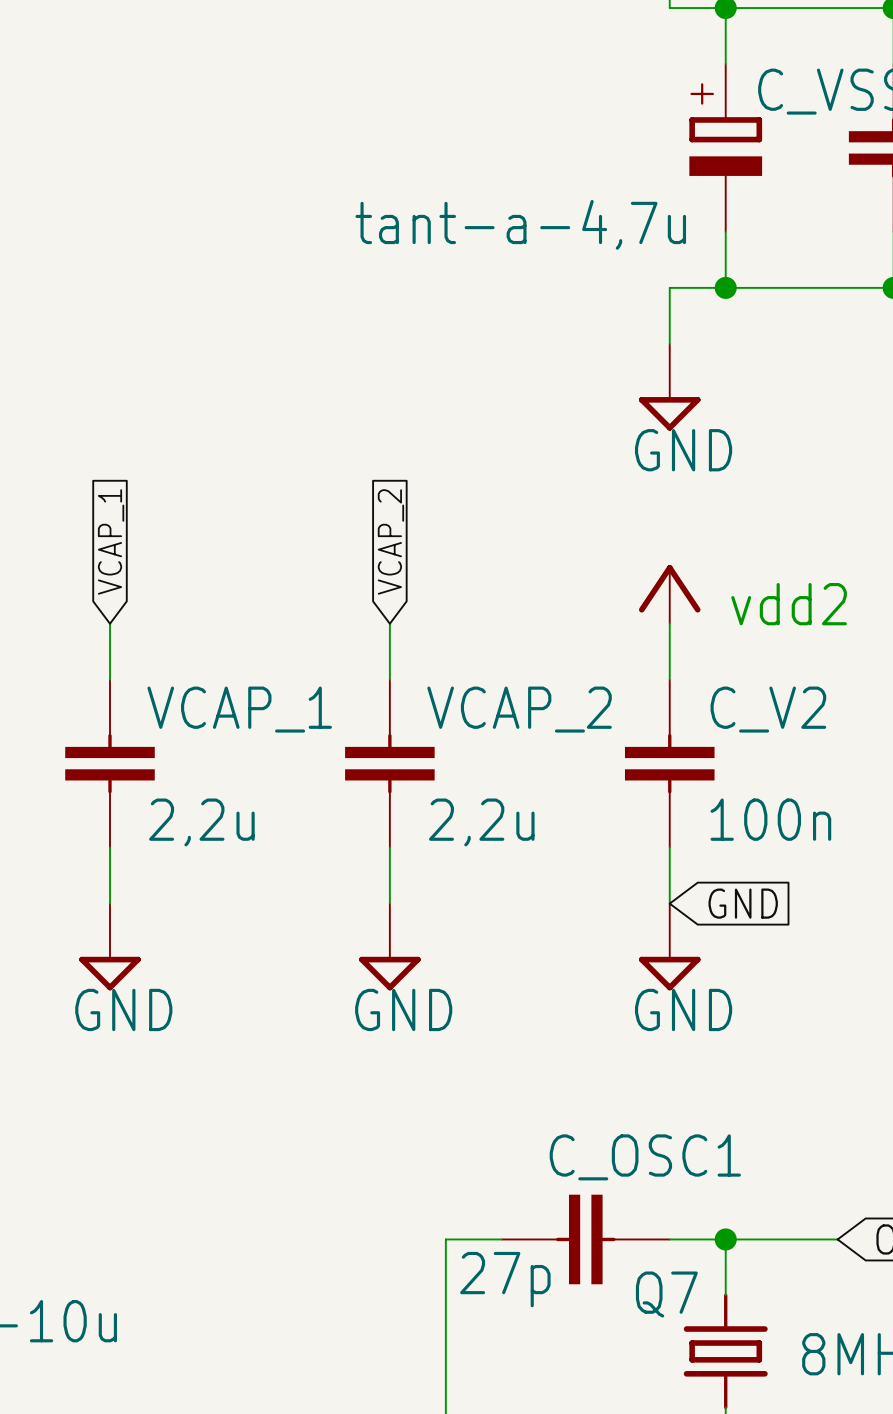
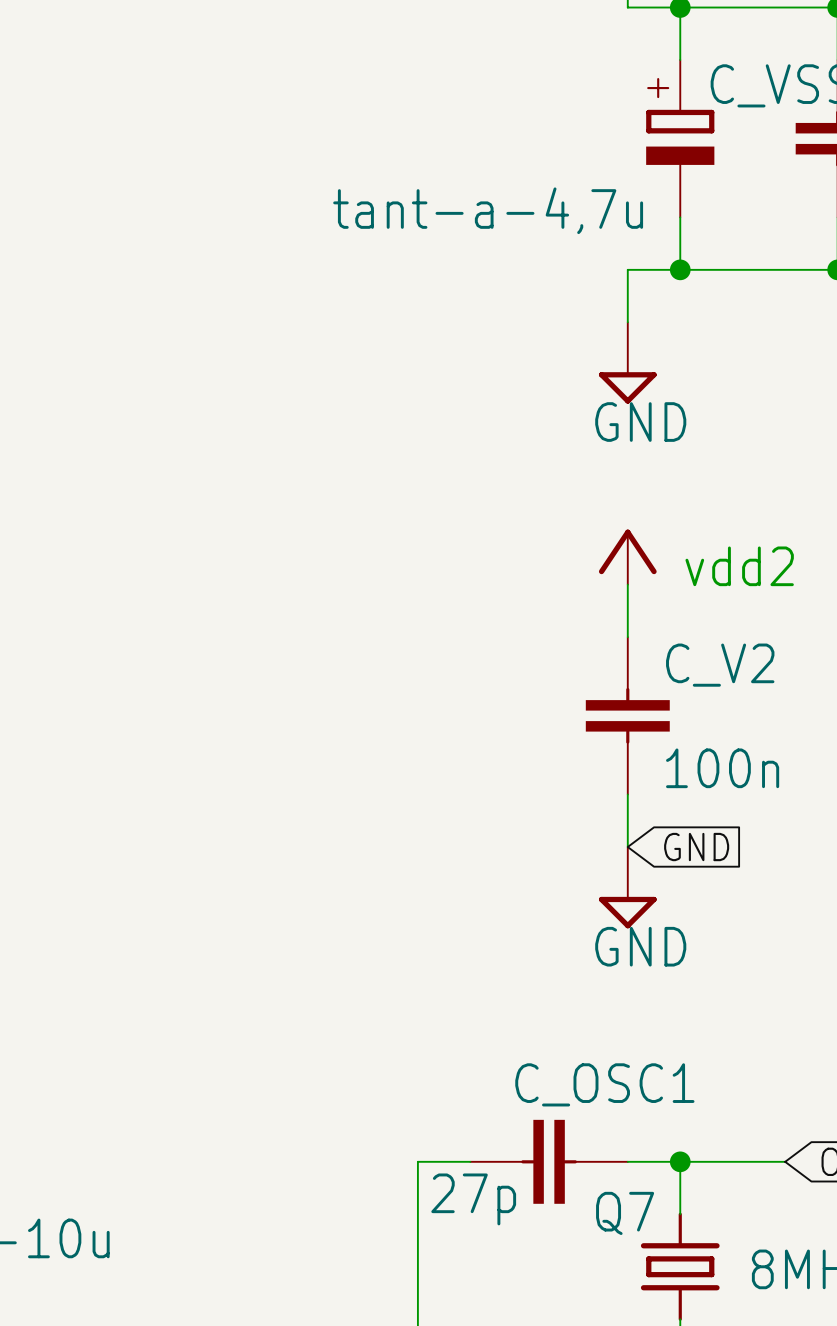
global label: VCAP_1 (111, 541) -> none
global label: VCAP_2 (390, 541) -> none
wire: (110, 623) (110, 679) -> none
wire: (389, 623) (389, 679) -> none
VCAP_1: 2,2u (110, 763) -> none
VCAP_2: 2,2u (389, 763) -> none
wire: (110, 847) (110, 903) -> none
wire: (389, 847) (389, 903) -> none
power symbol: GND (110, 947) -> none
power symbol: GND (389, 947) -> none

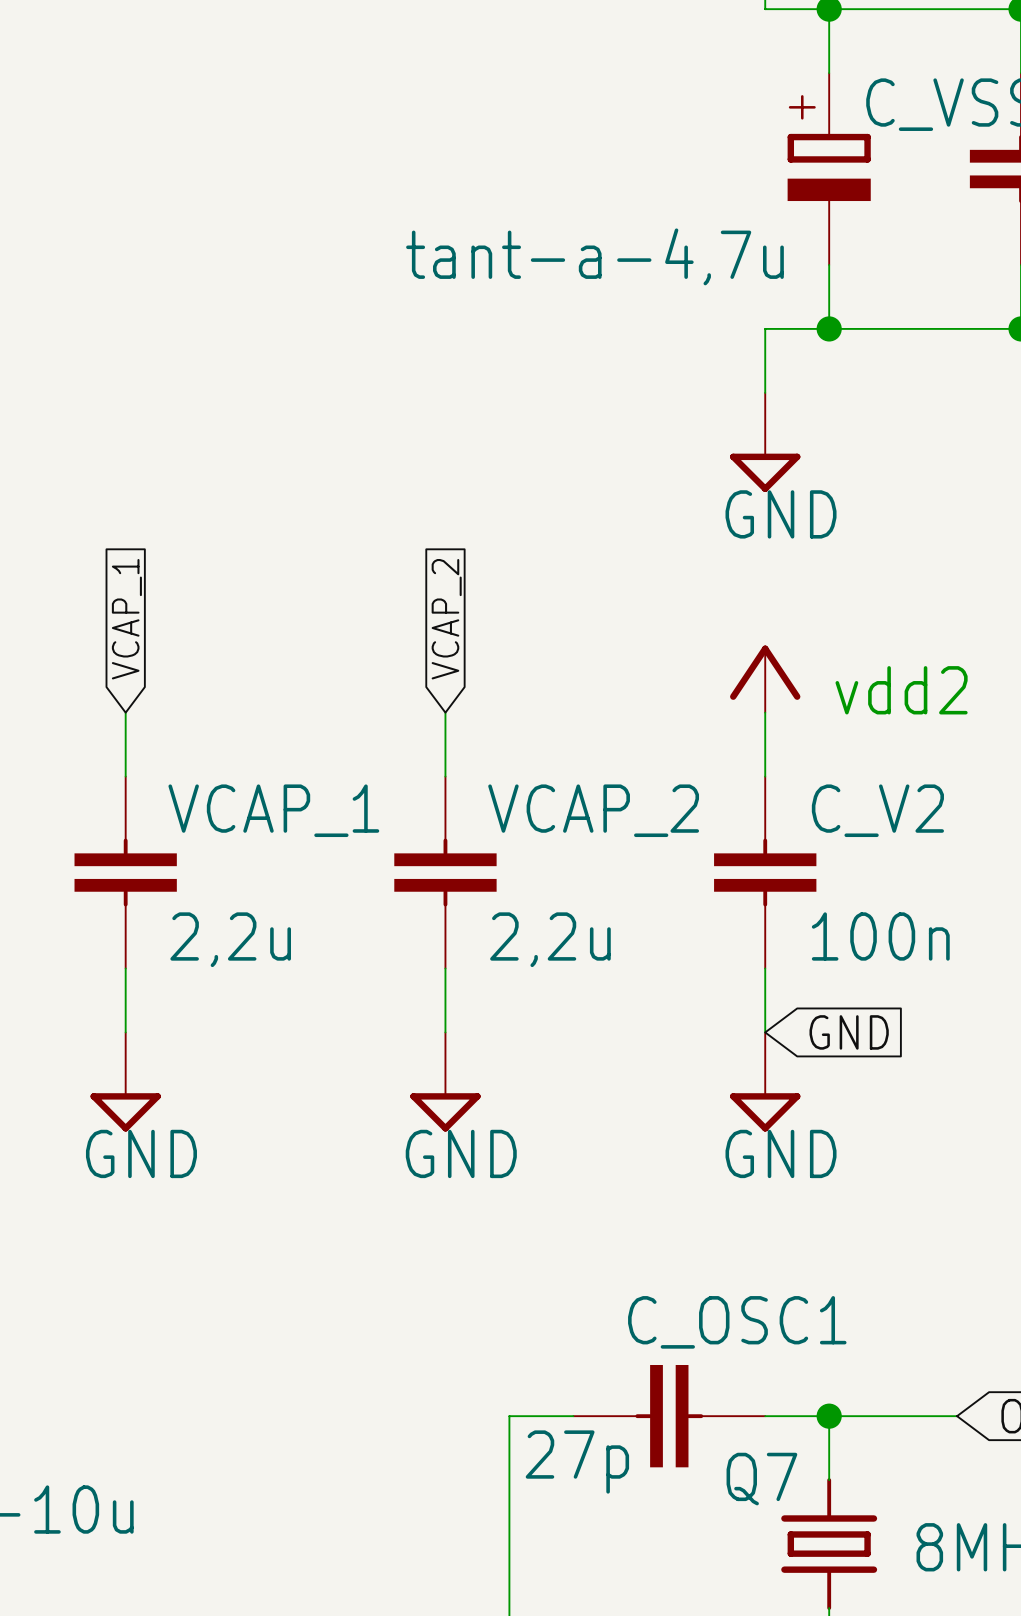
global label: none -> VCAP_1 (126, 619)
global label: none -> VCAP_2 (446, 619)
wire: none -> (125, 712) (125, 776)
wire: none -> (445, 712) (445, 776)
VCAP_1: none -> 2,2u (125, 872)
VCAP_2: none -> 2,2u (445, 872)
wire: none -> (125, 968) (125, 1032)
wire: none -> (445, 968) (445, 1032)
power symbol: none -> GND (125, 1082)
power symbol: none -> GND (445, 1082)

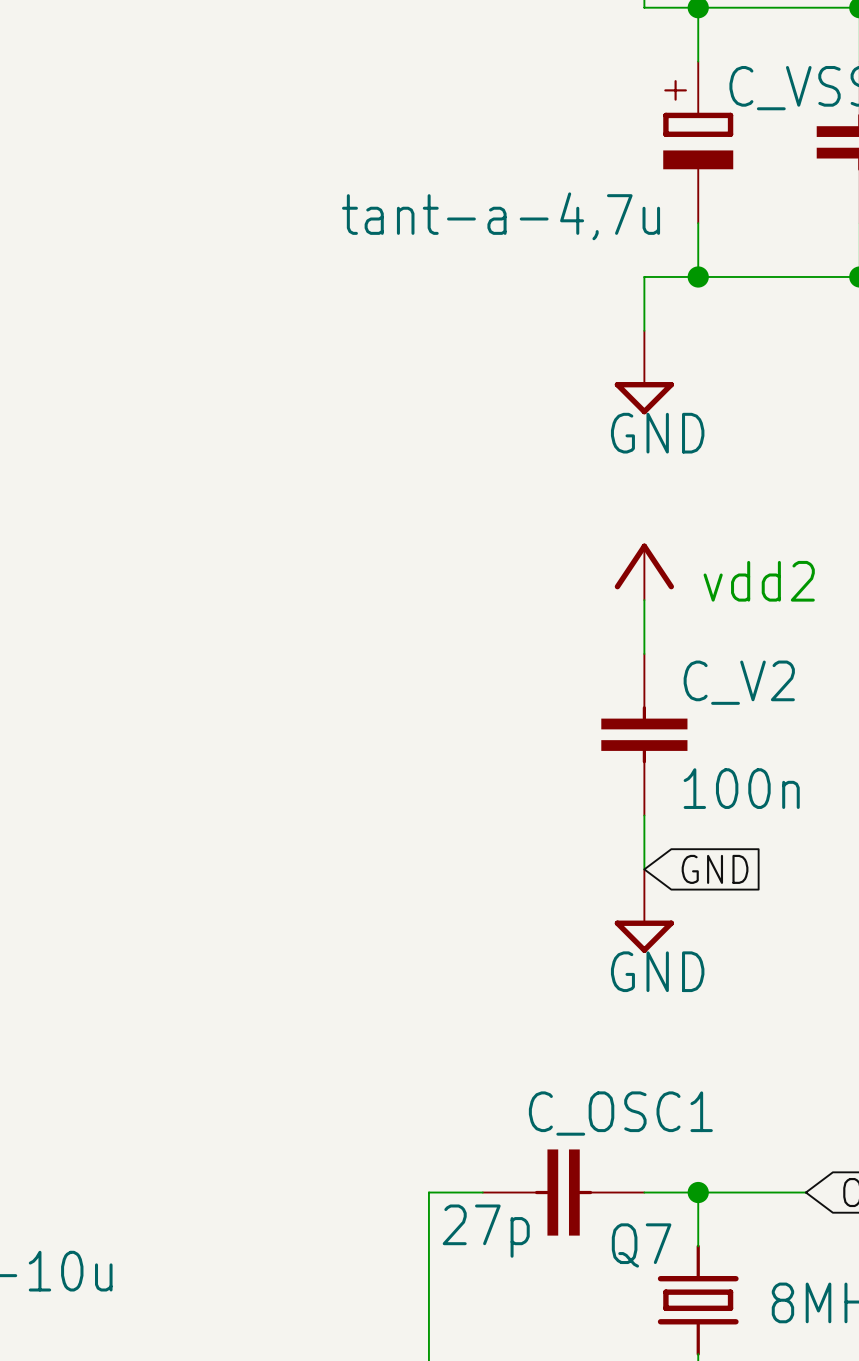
global label: VCAP_1 (126, 619) -> none
global label: VCAP_2 (446, 619) -> none
wire: (125, 712) (125, 776) -> none
wire: (445, 712) (445, 776) -> none
VCAP_1: 2,2u (125, 872) -> none
VCAP_2: 2,2u (445, 872) -> none
wire: (125, 968) (125, 1032) -> none
wire: (445, 968) (445, 1032) -> none
power symbol: GND (125, 1082) -> none
power symbol: GND (445, 1082) -> none

